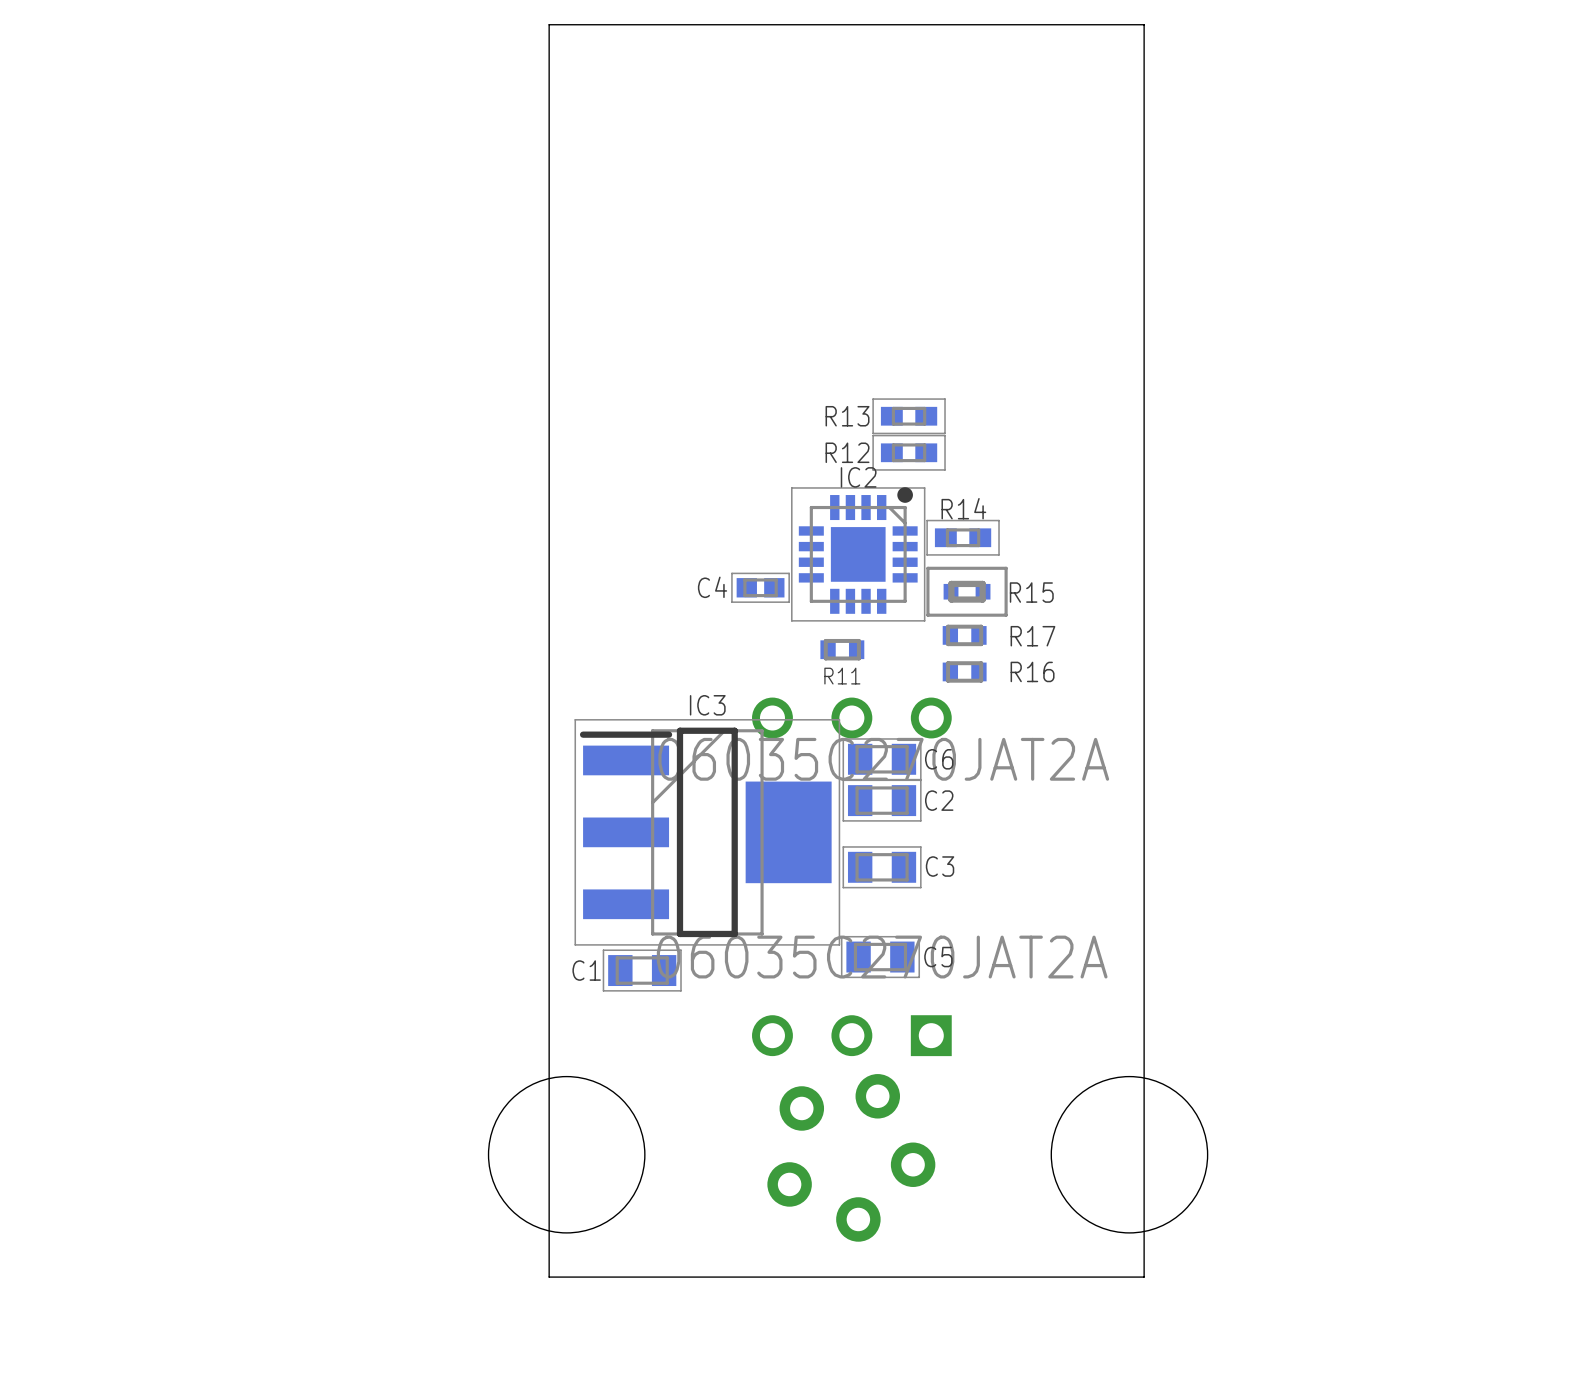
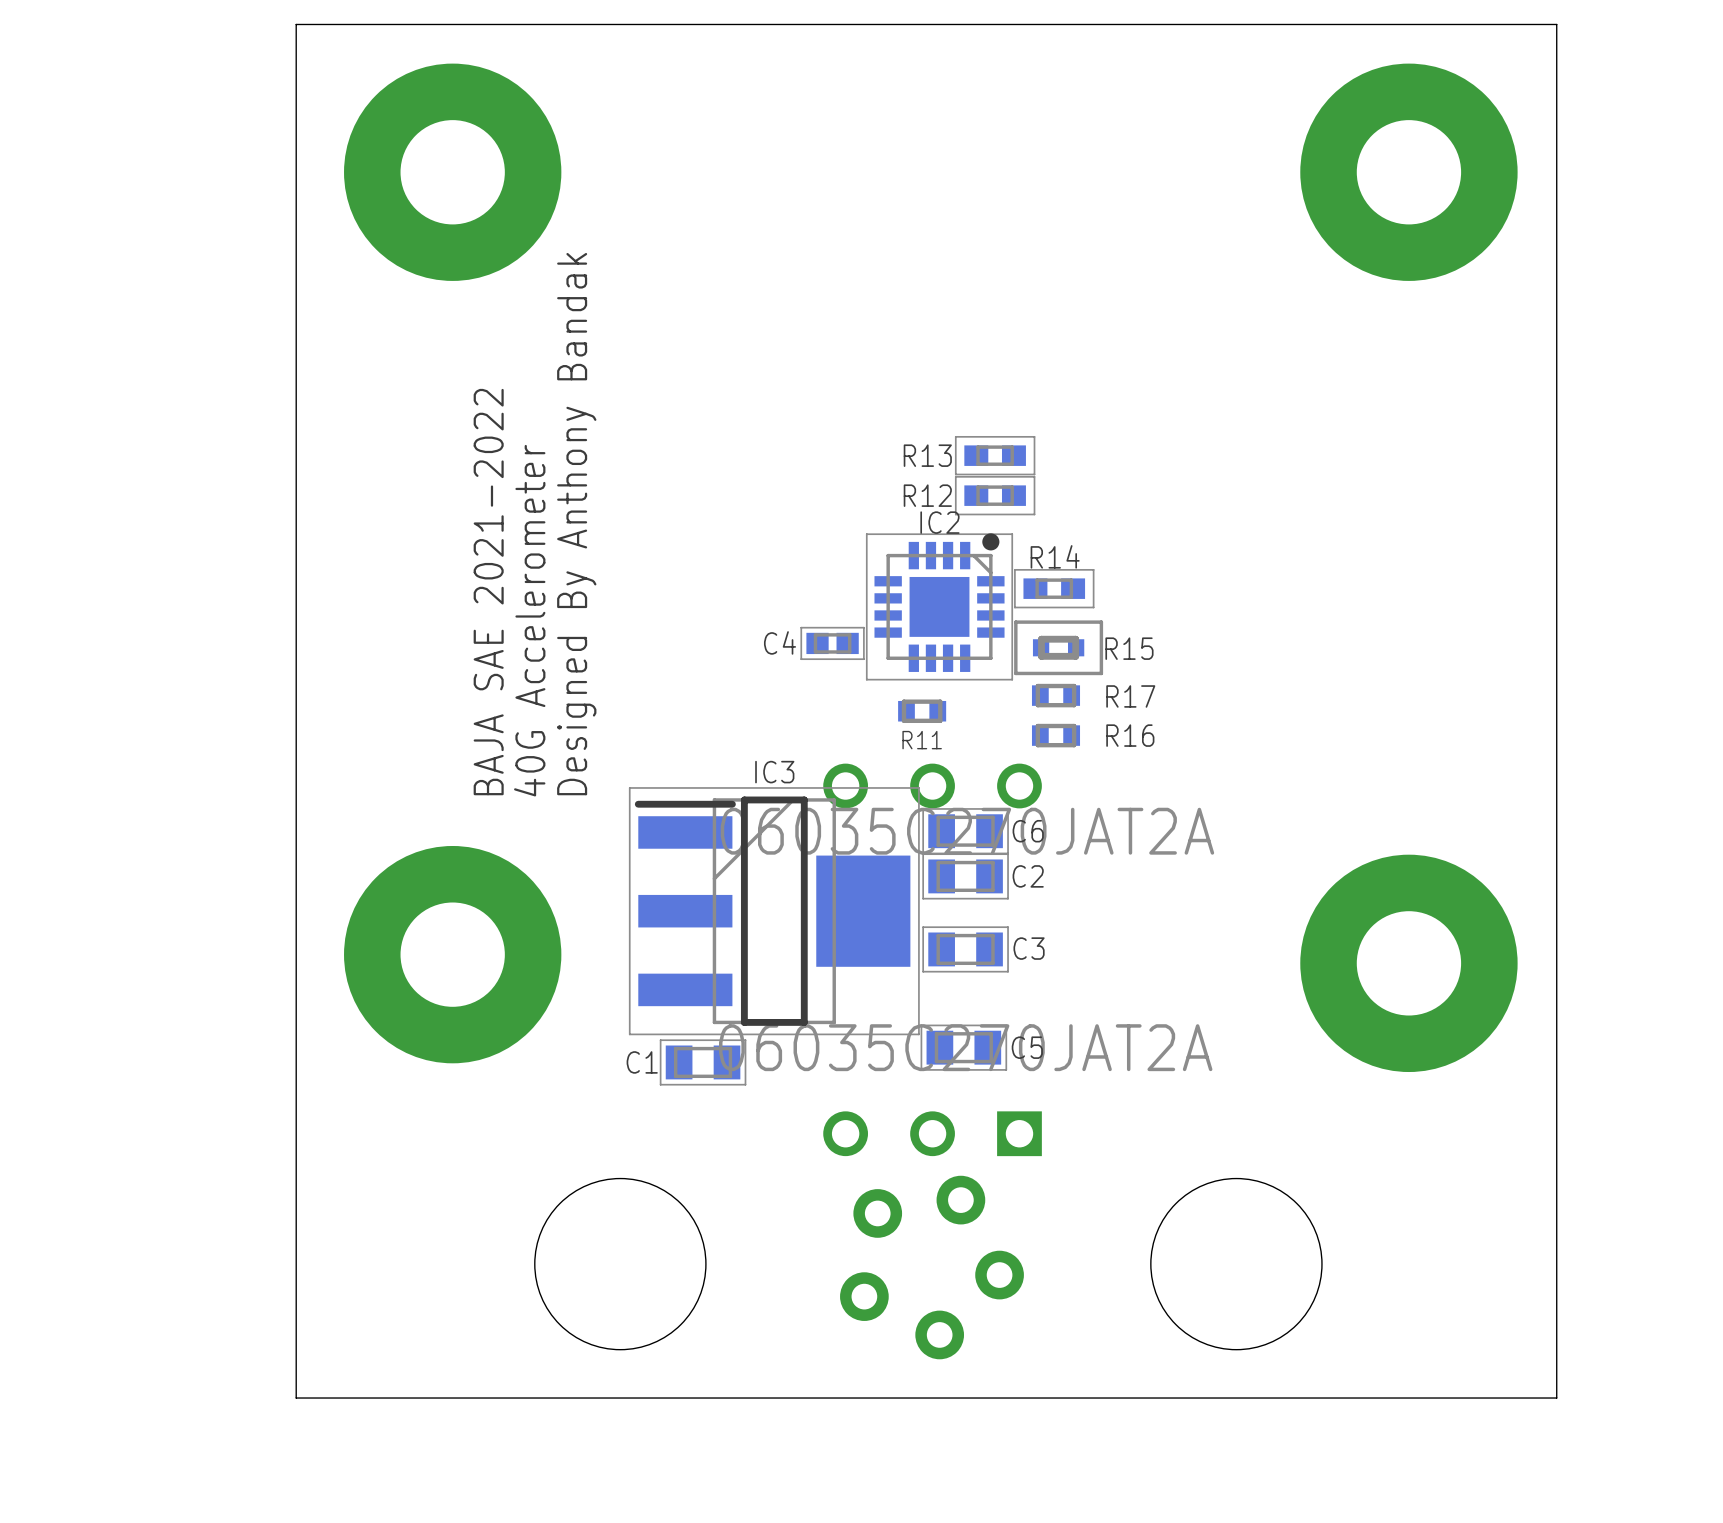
part: none -> (452, 172)
part: none -> (1408, 172)
text: none -> Designed By Anthony Bandak (576, 524)
text: none -> BAJA SAE 2021-2022 (488, 592)
text: none -> 40G Accelerometer (529, 620)
part: none -> (452, 954)
part: none -> (1408, 963)
board edge: (1144, 1277) (1144, 24) (549, 24) (549, 1277) -> (1252, 1398) (1556, 1398) (1556, 24) (296, 24) (296, 1398) (601, 1398)

